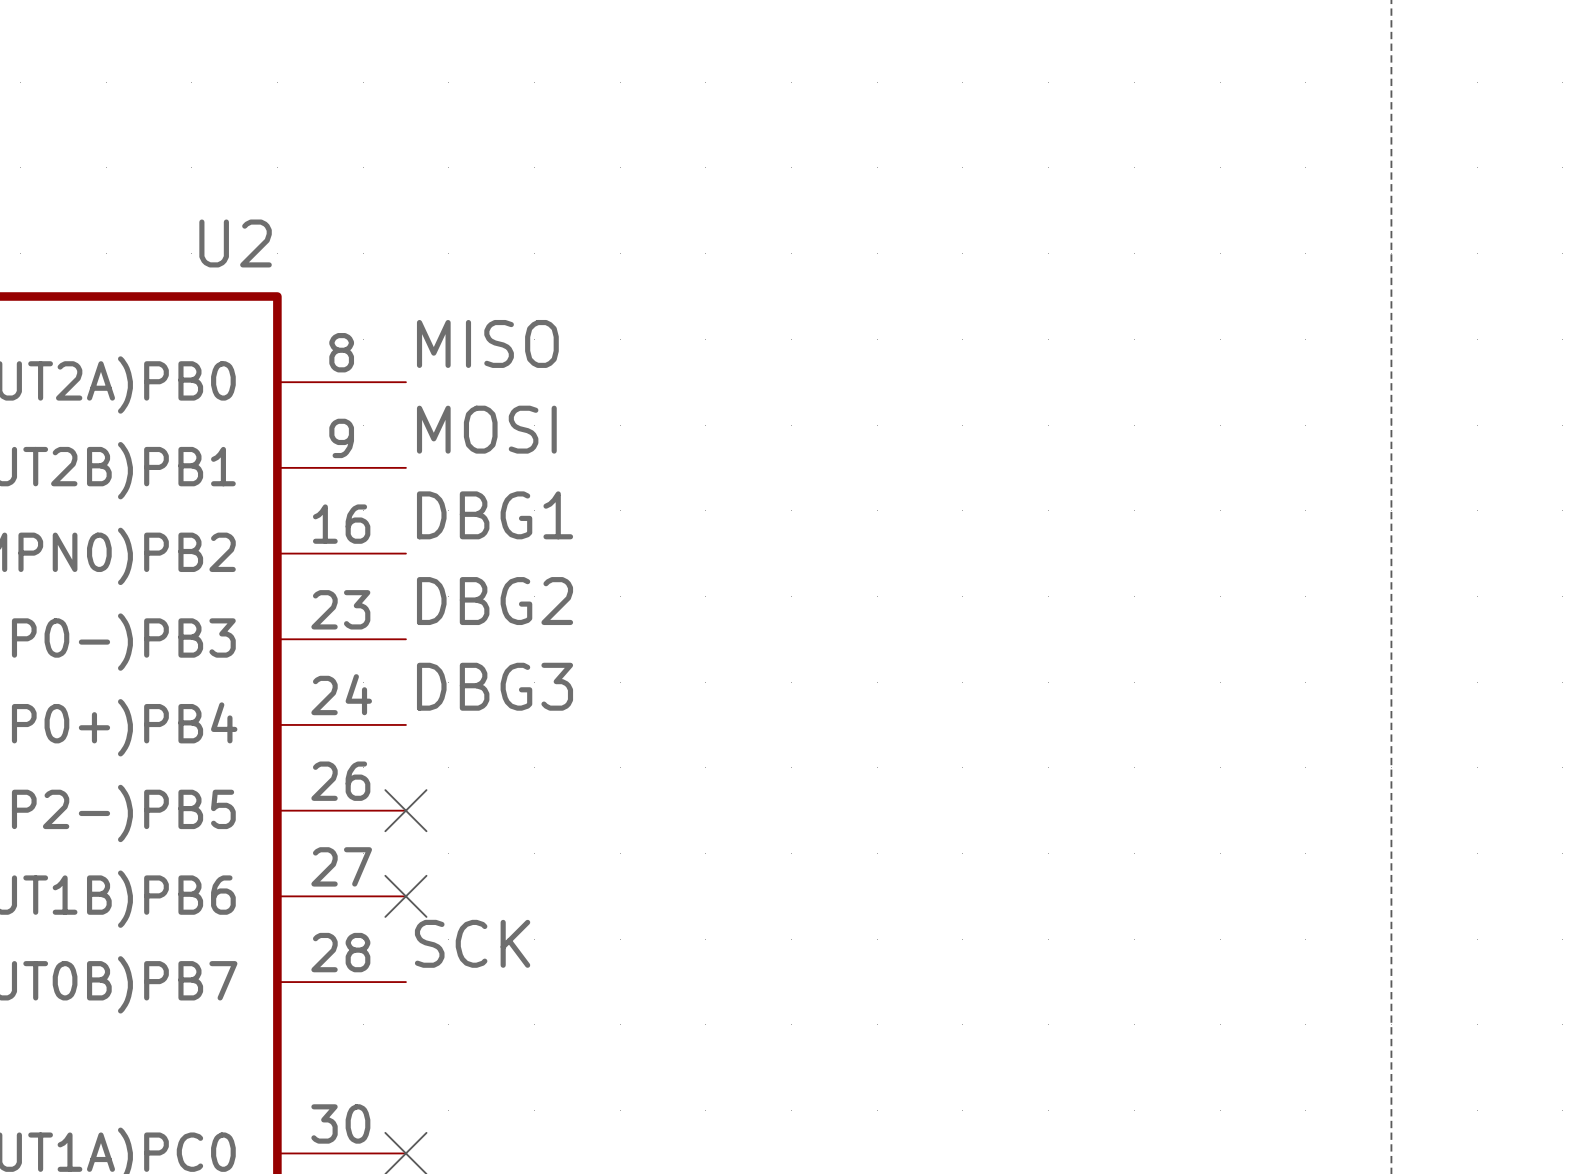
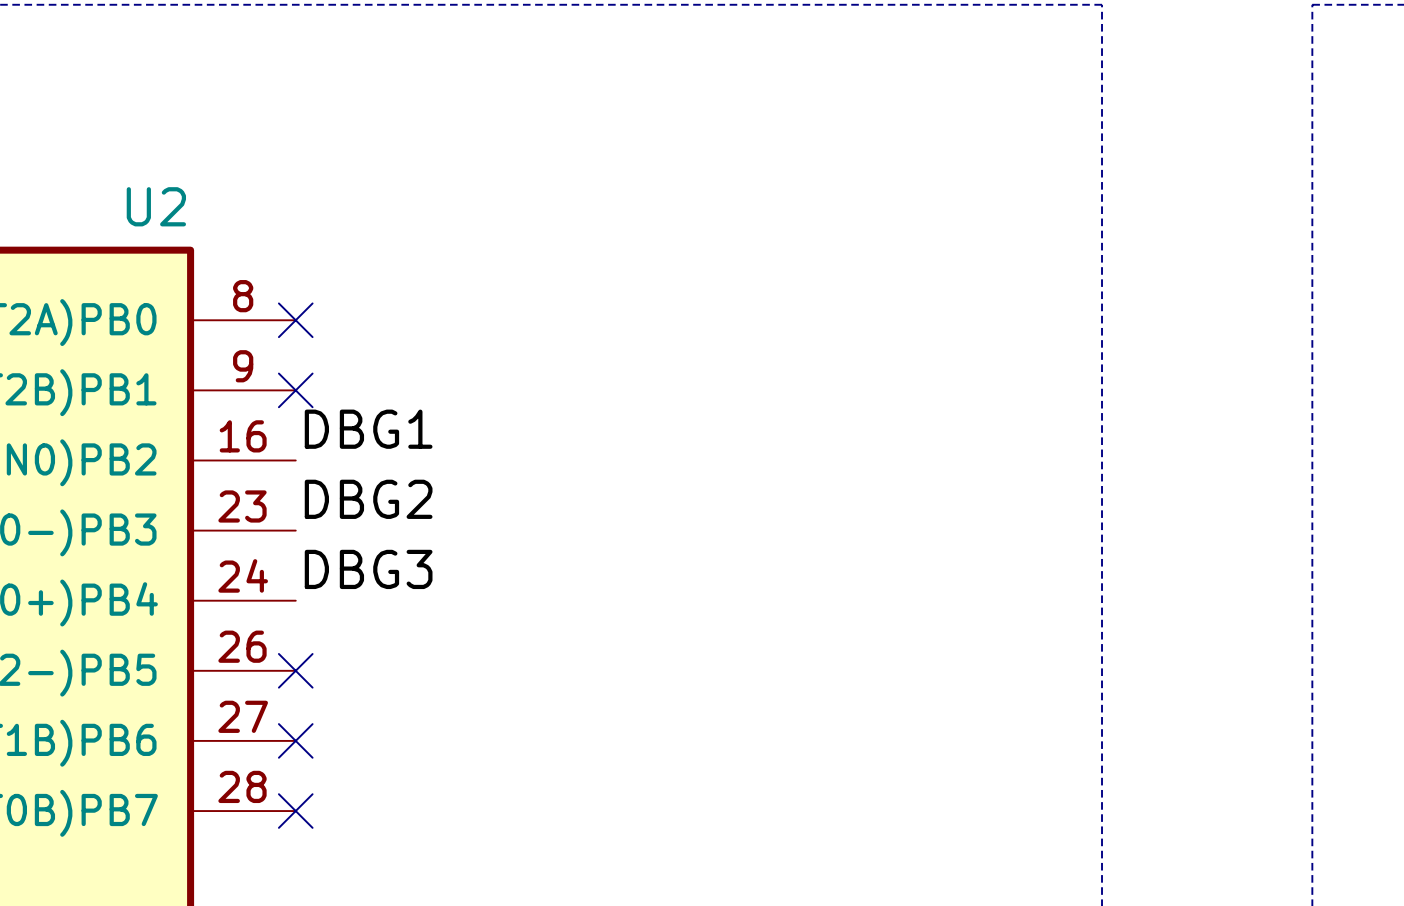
label: MISO (487, 343) -> none
no-connect mark: none -> (295, 320)
label: MOSI (486, 429) -> none
no-connect mark: none -> (295, 390)
label: SCK (472, 943) -> none
no-connect mark: none -> (295, 811)

